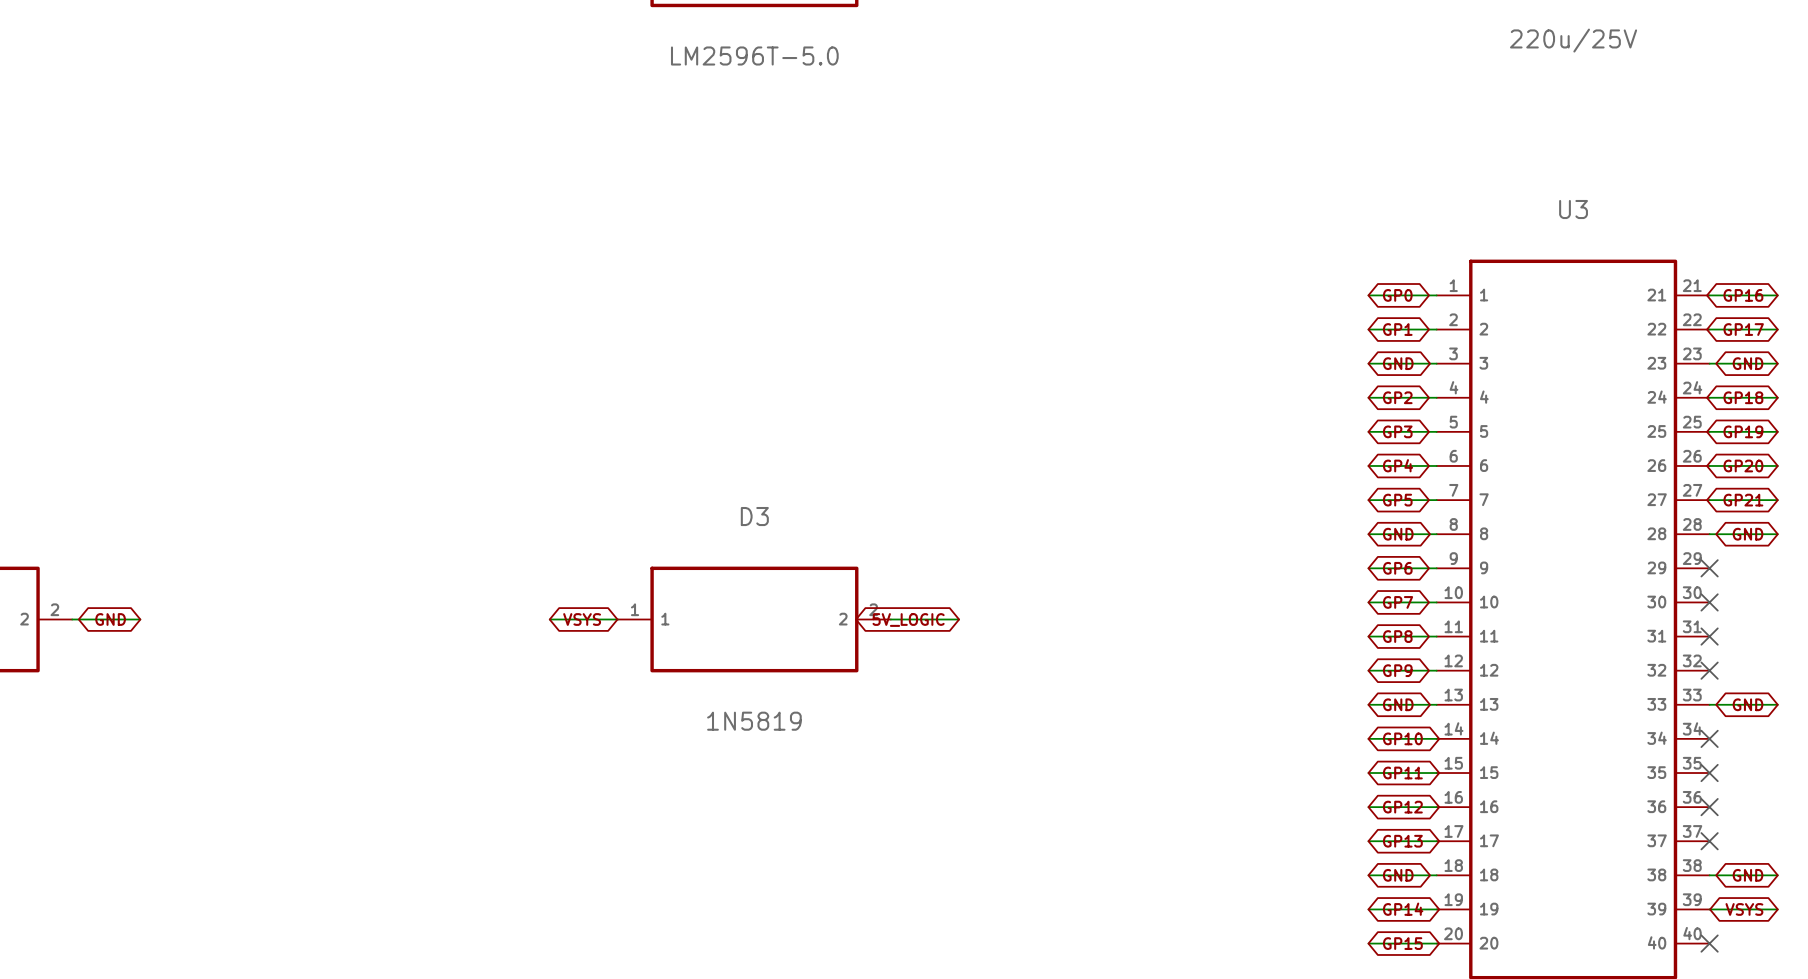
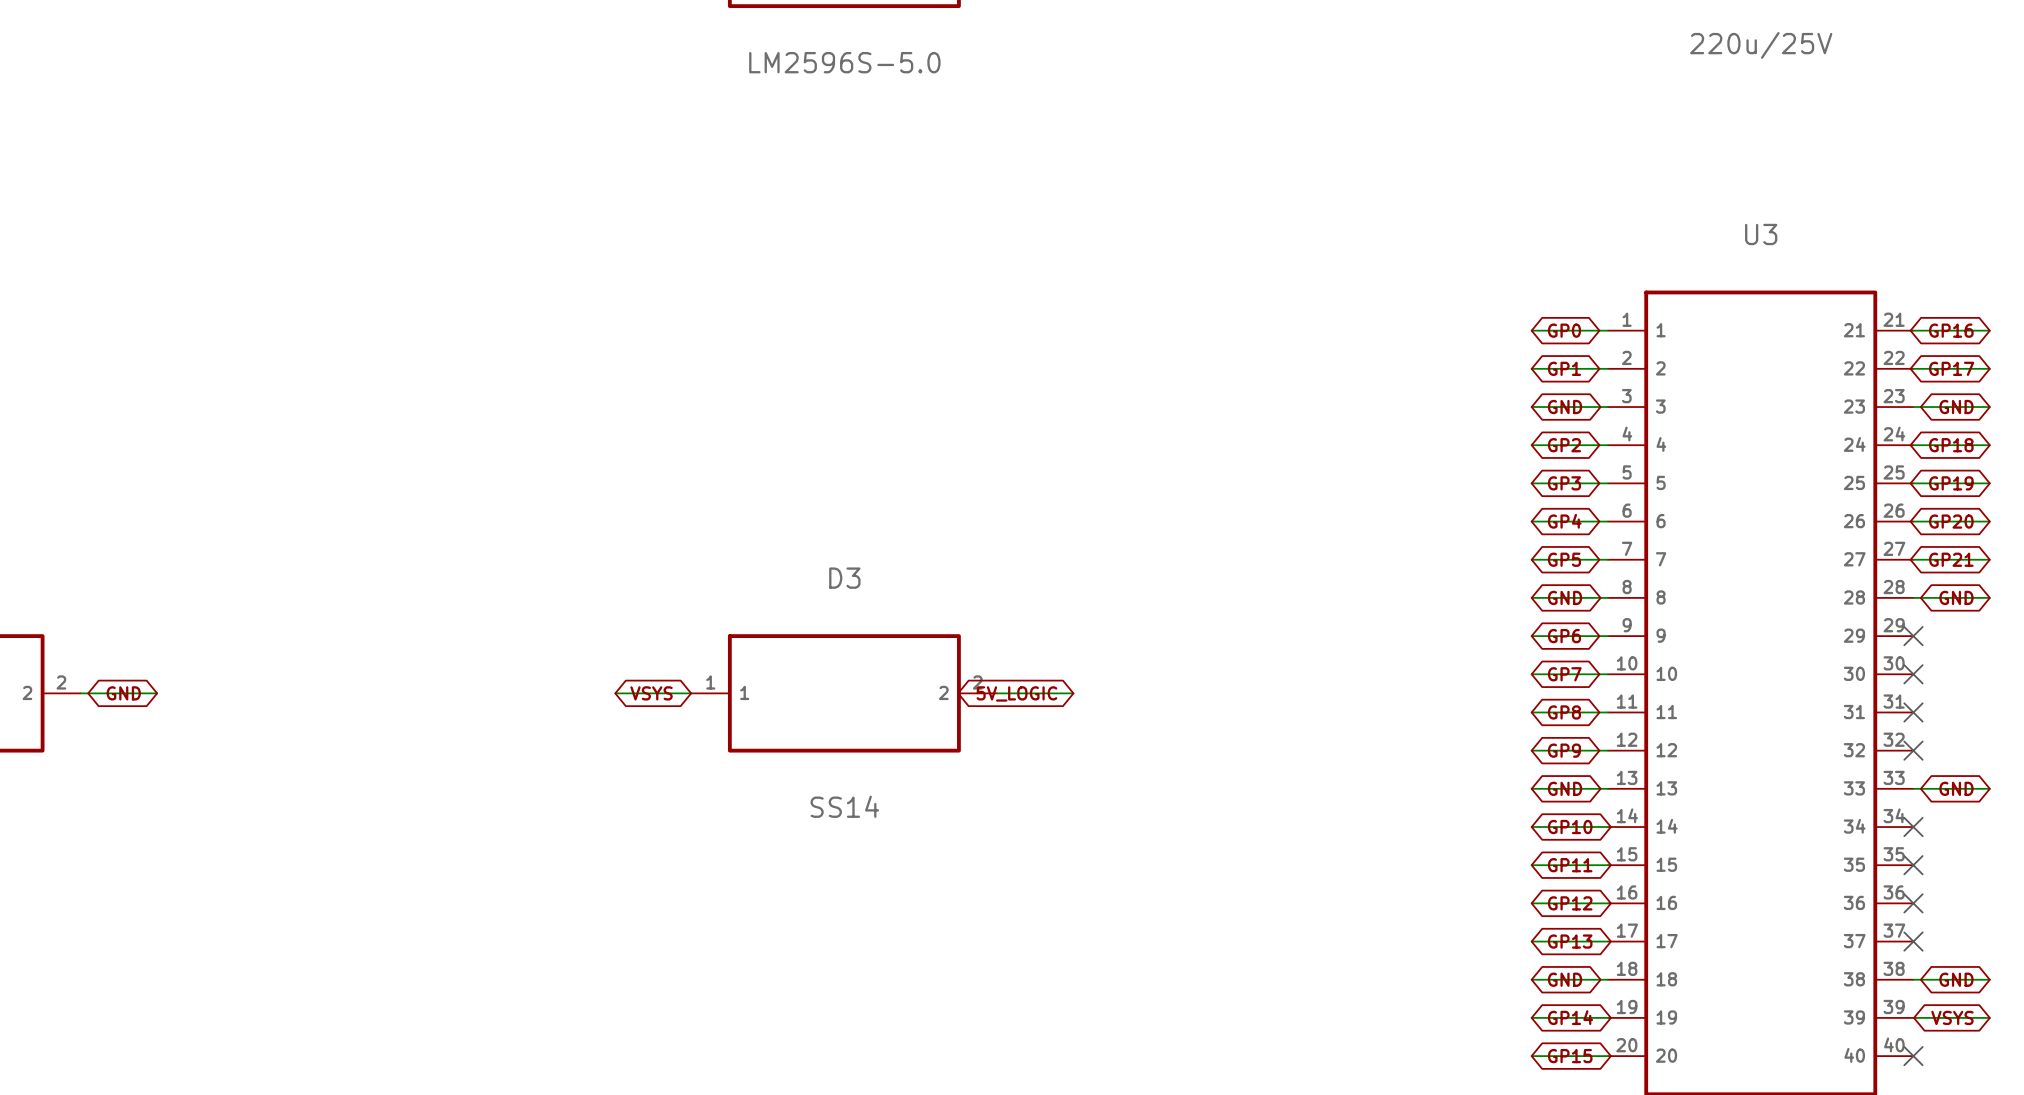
part value: LM2596T-5.0 (754, 55) -> LM2596S-5.0 (844, 62)
D3 value: 1N5819 (754, 721) -> SS14 (844, 806)

